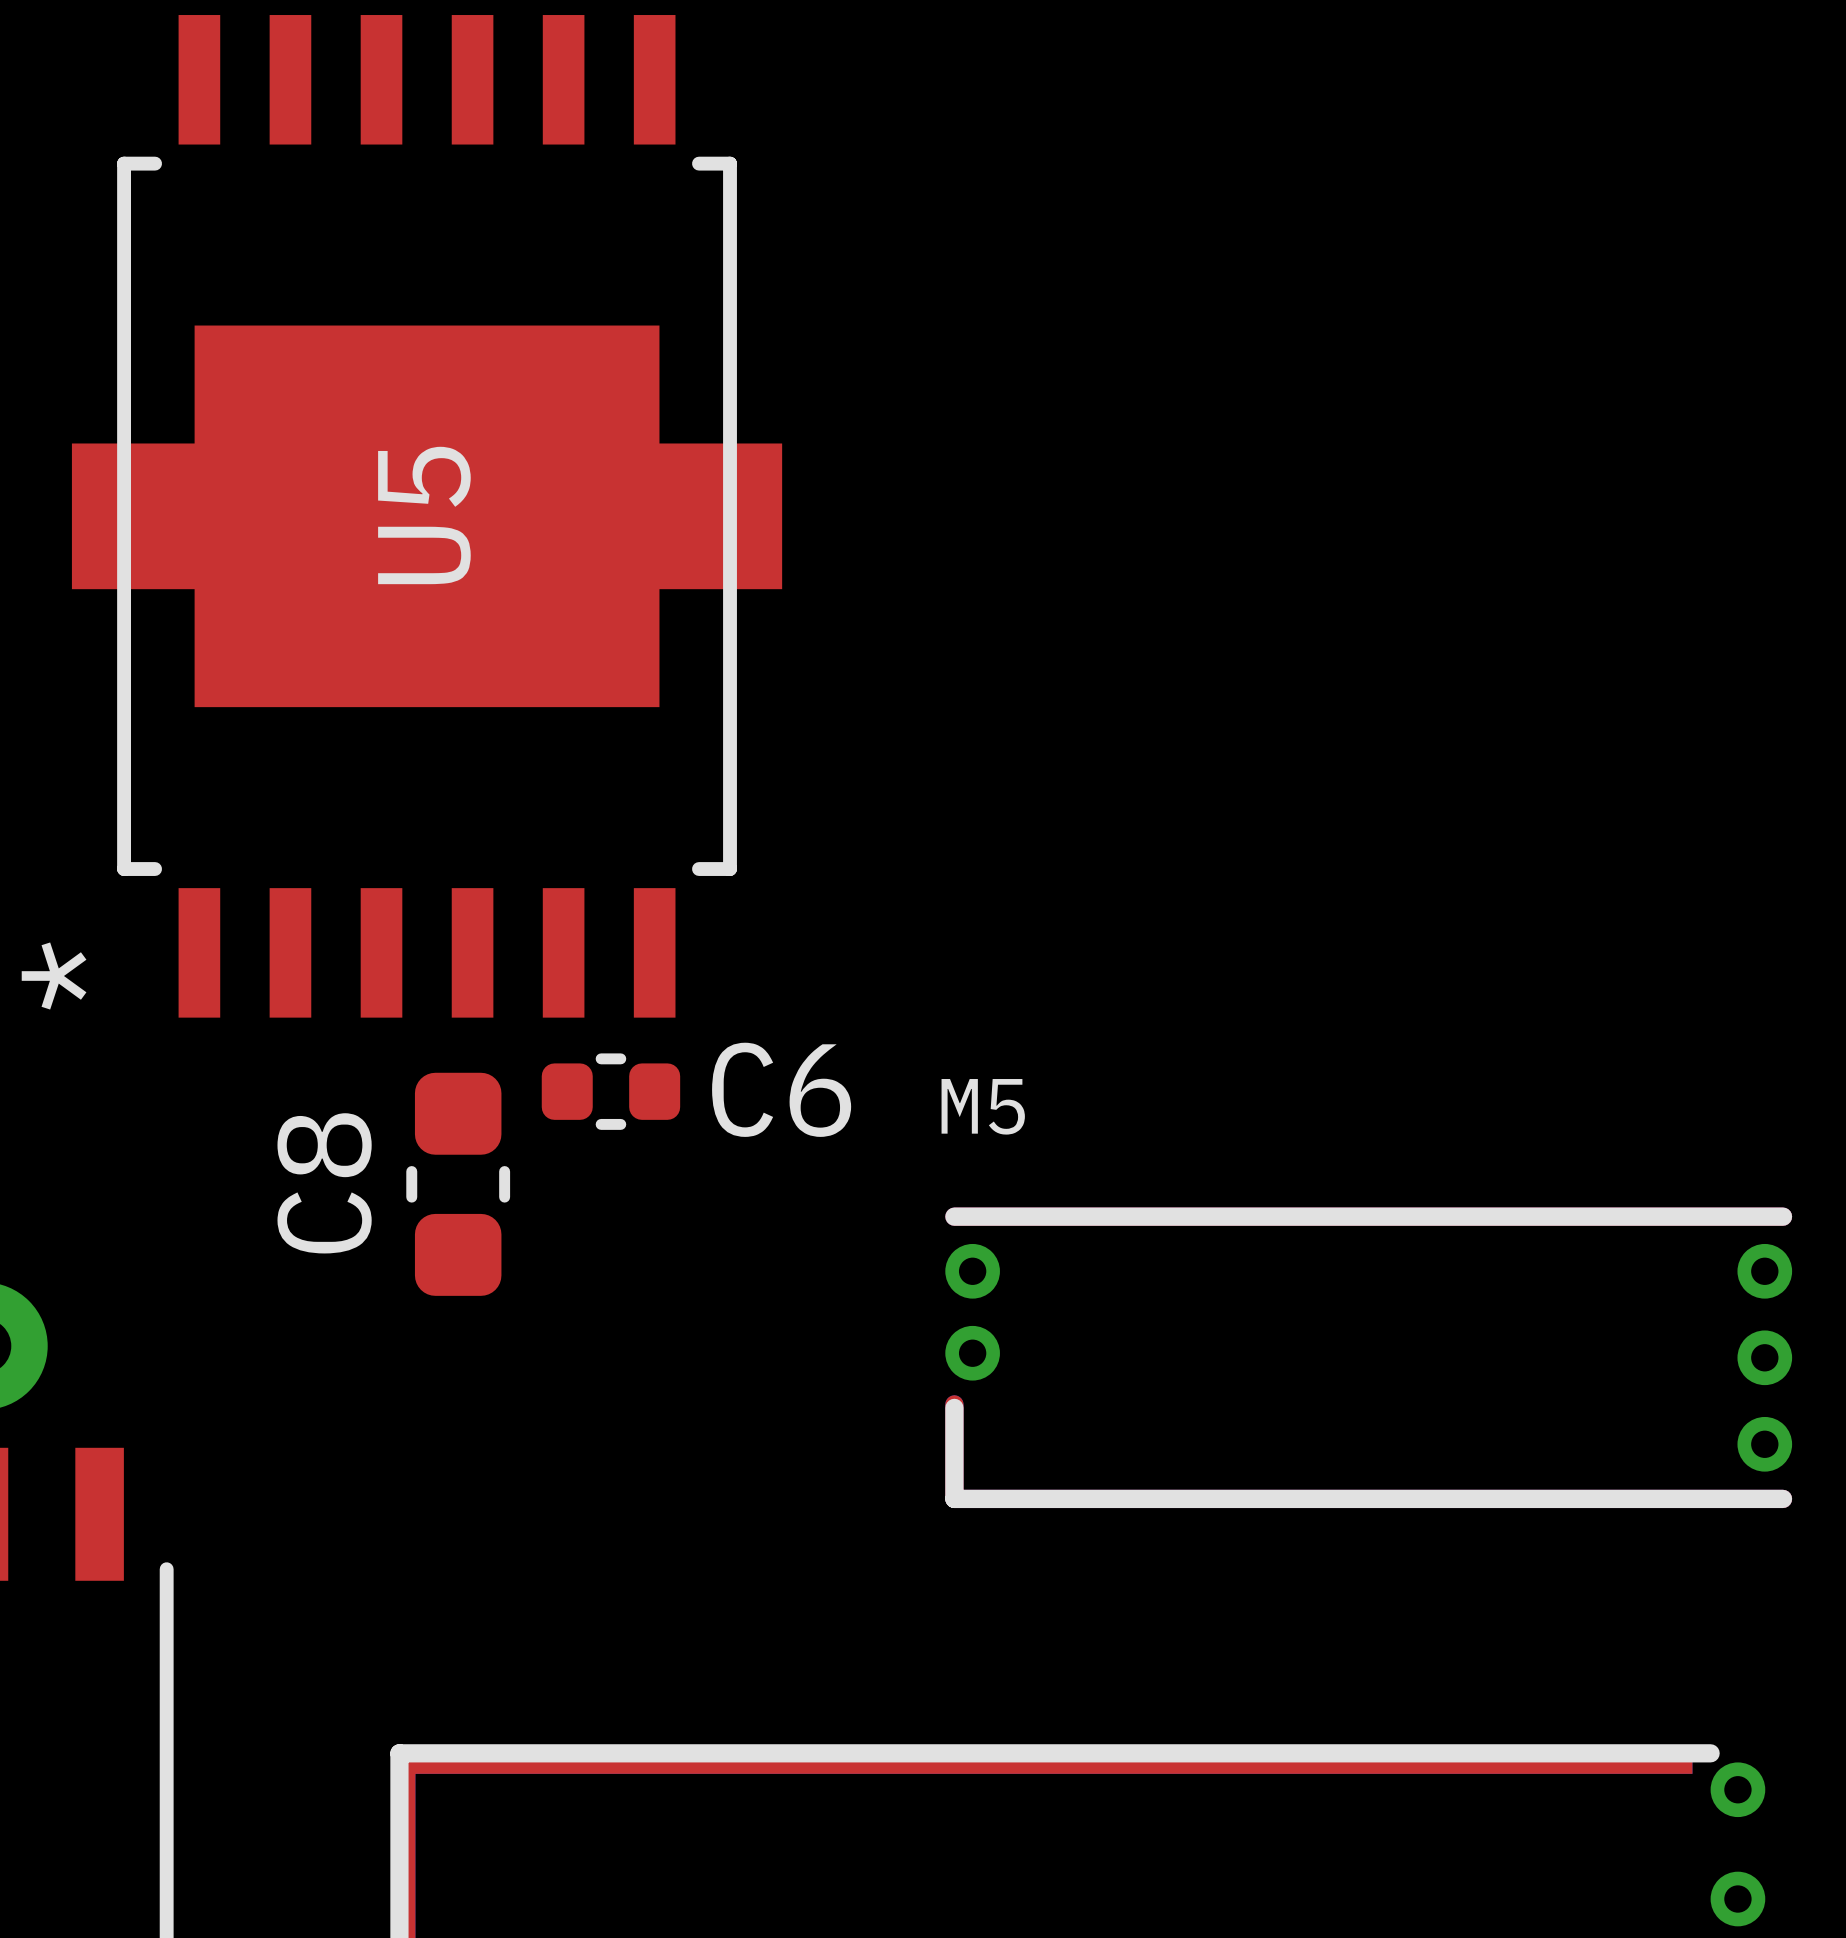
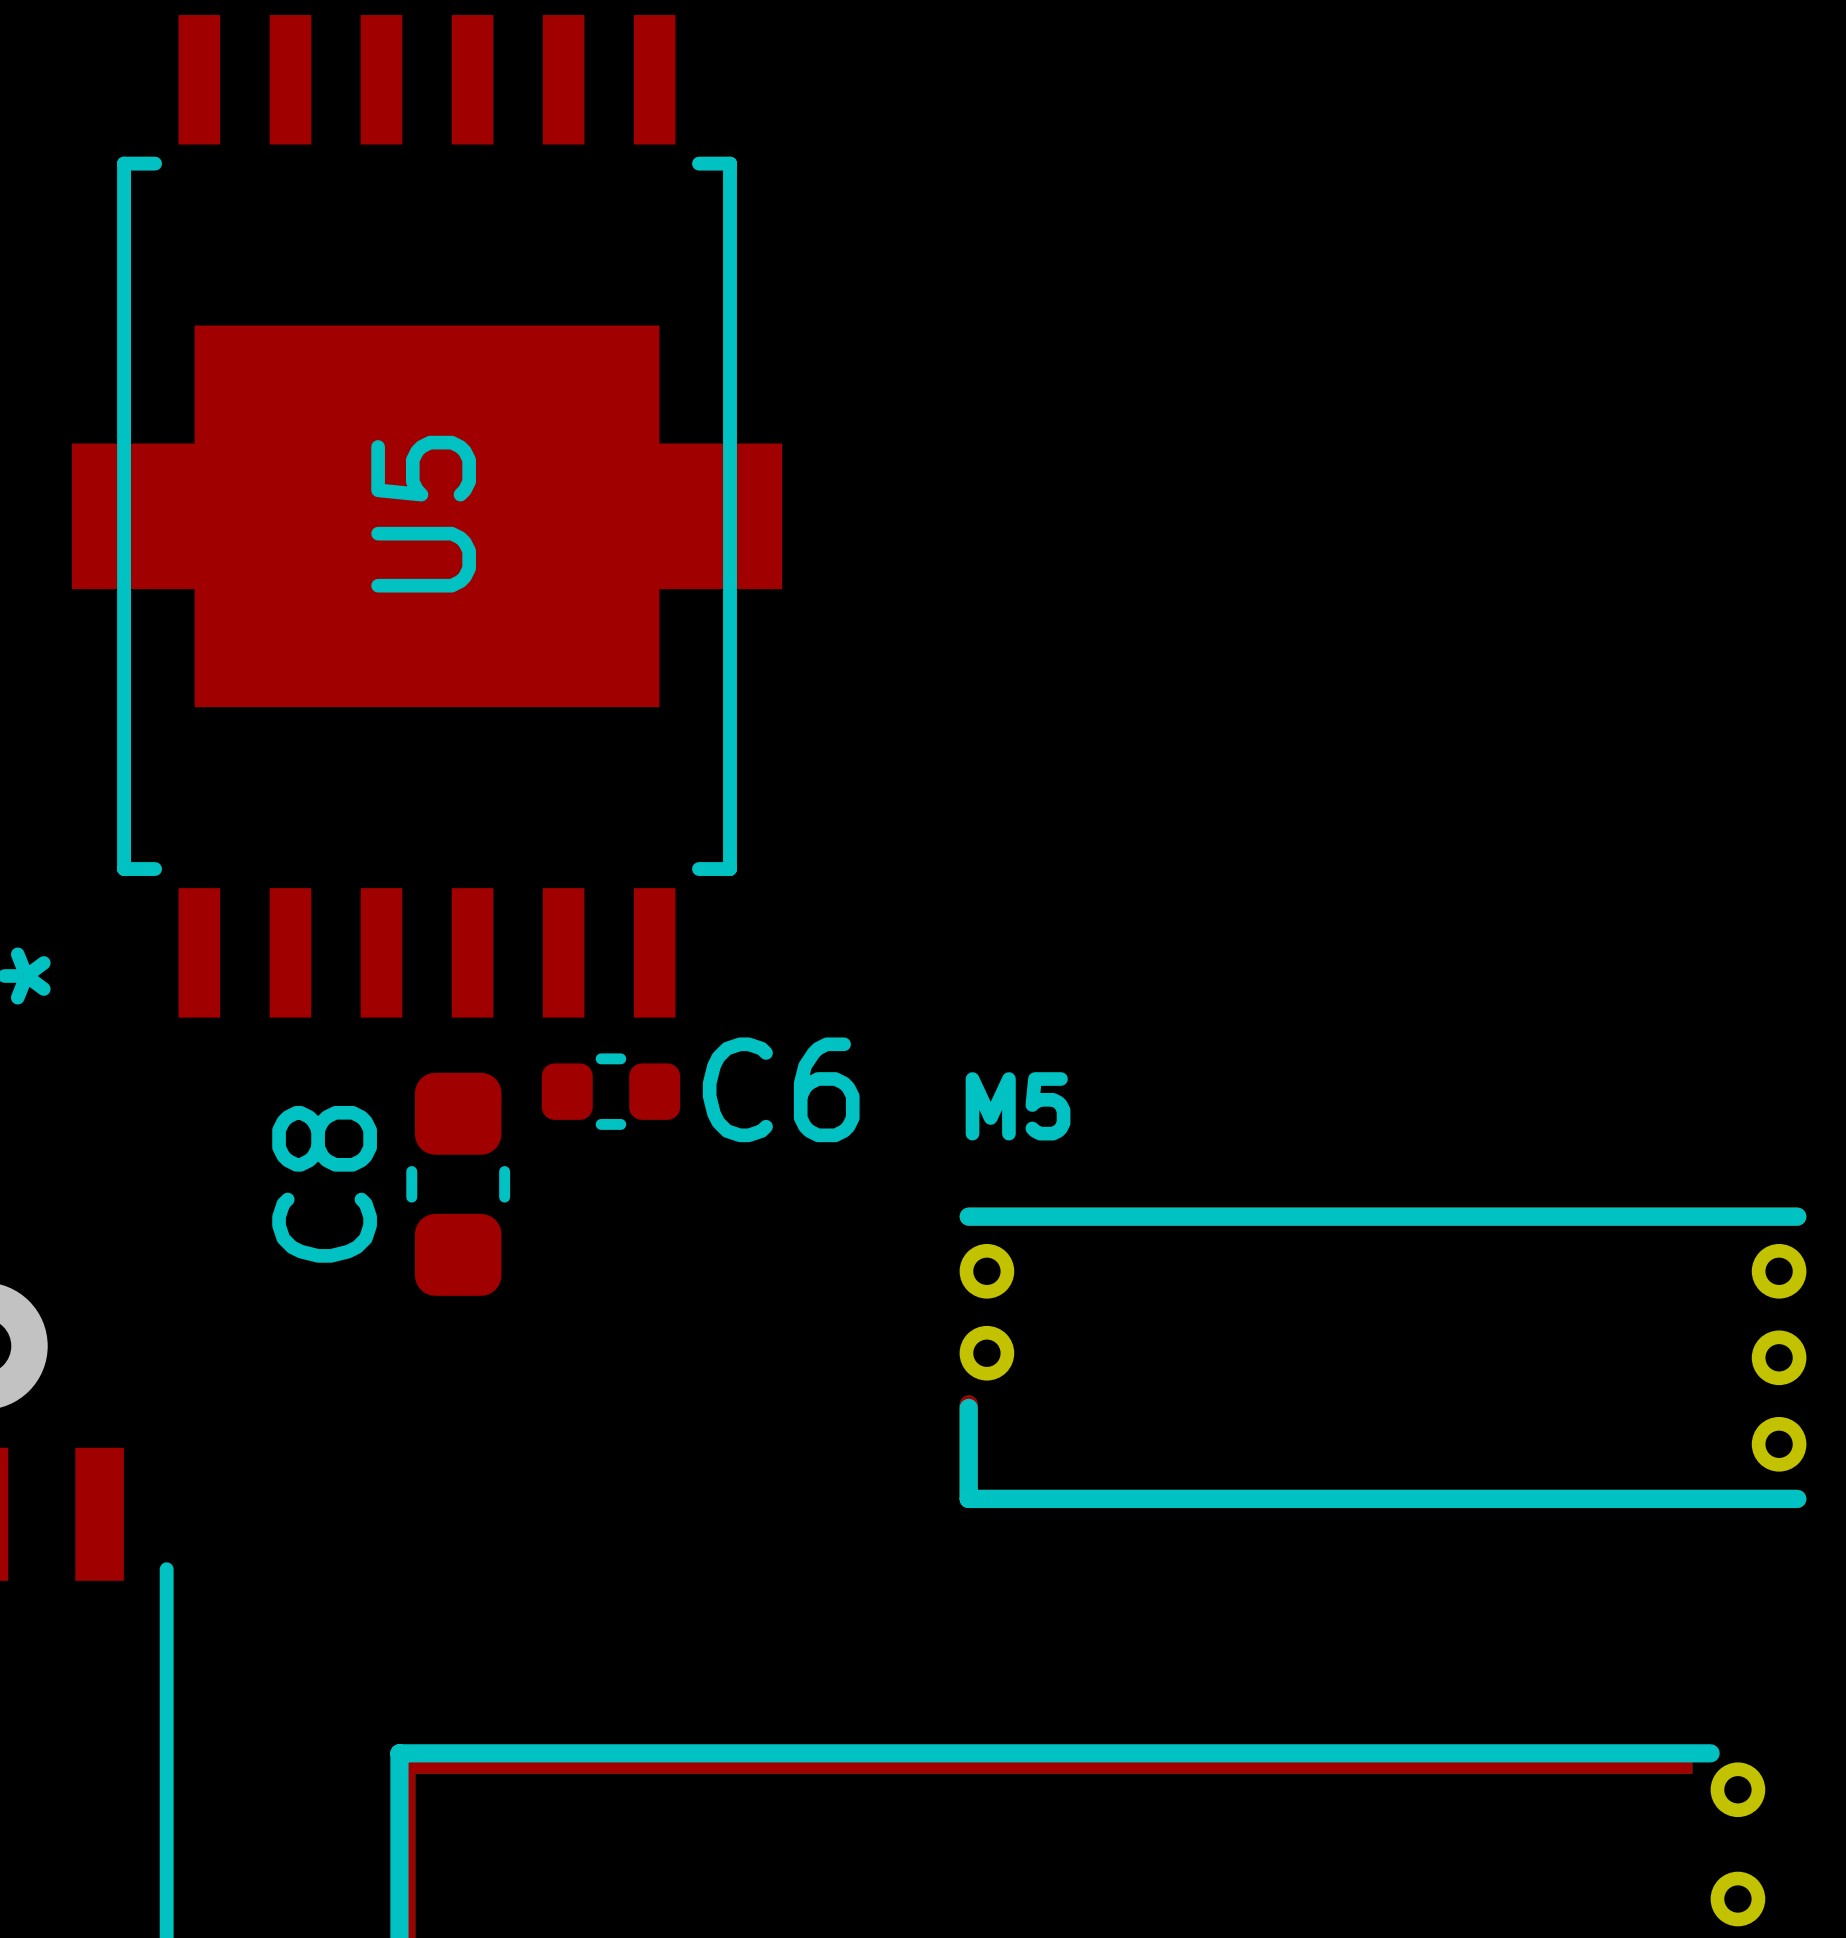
M5 position: (1368, 1357) -> (1383, 1357)

